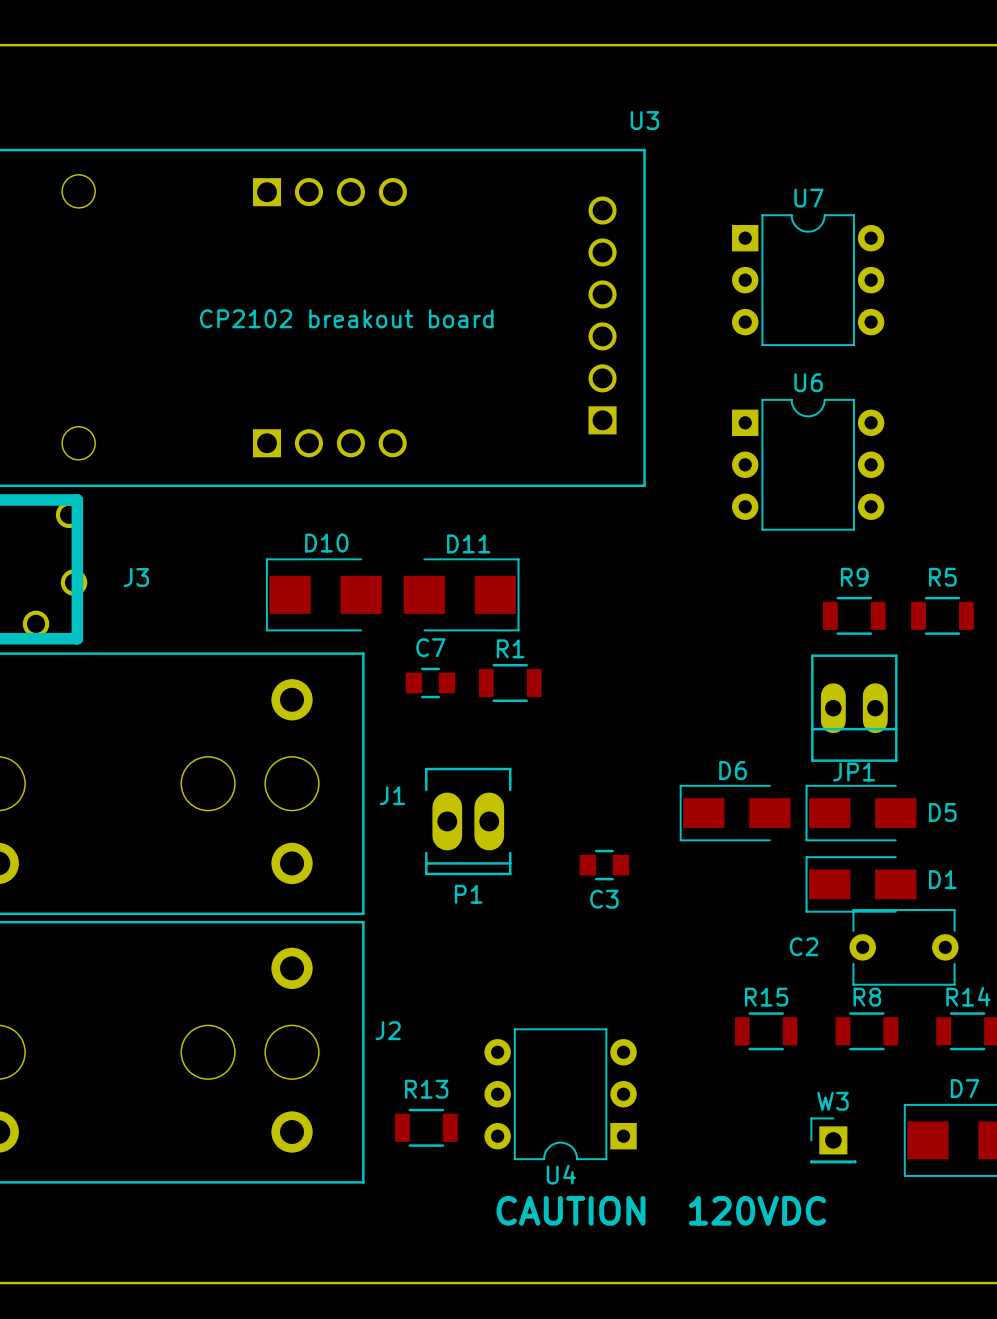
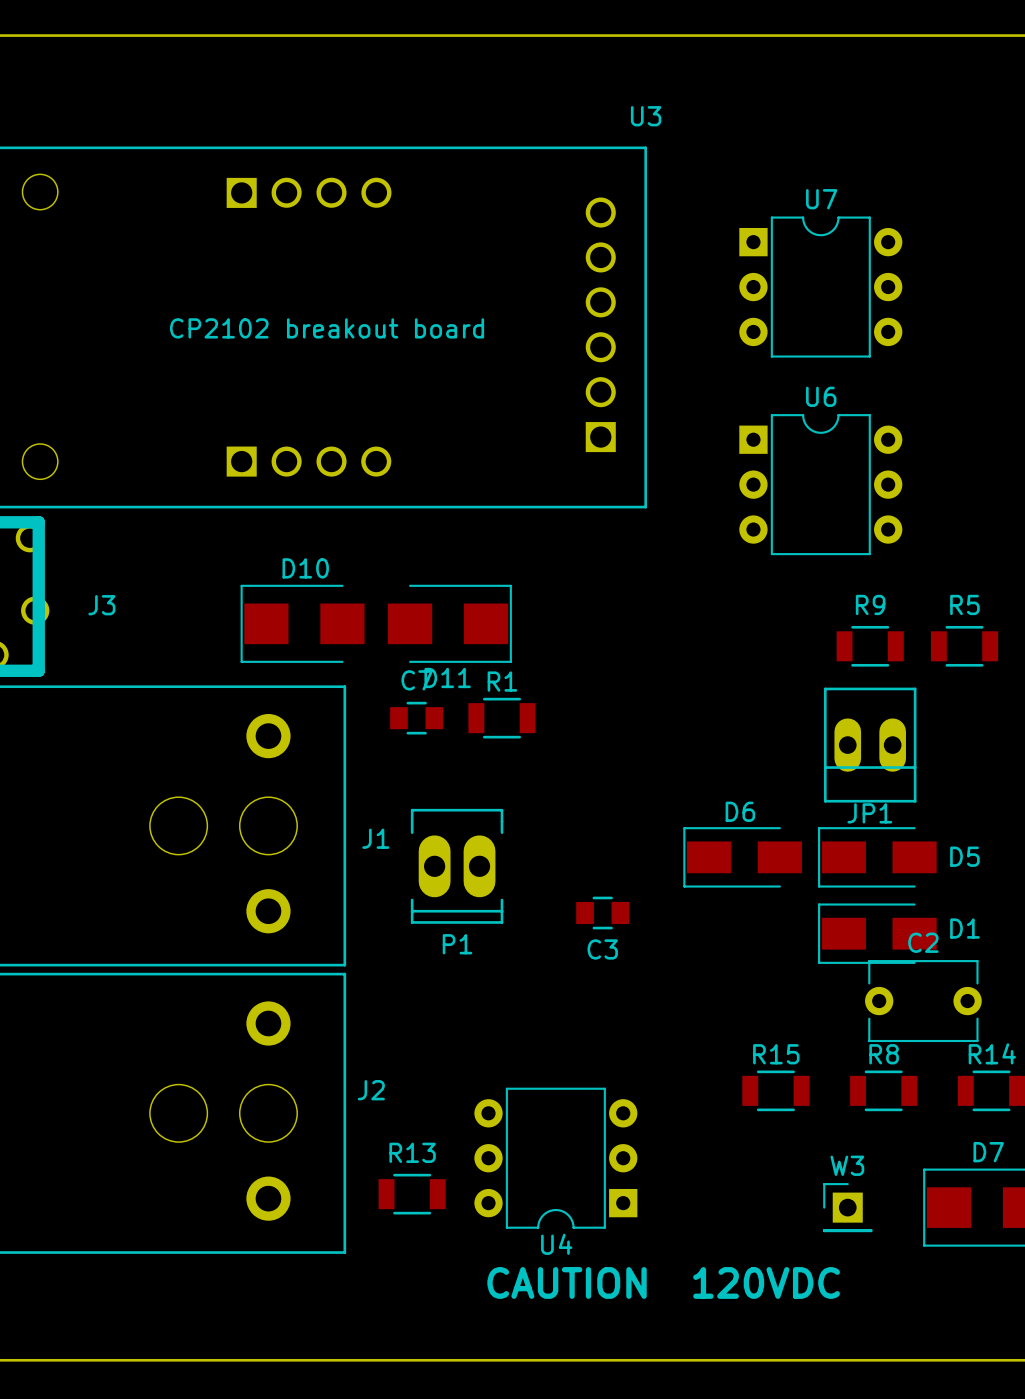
D11 name position: D11 (468, 543) -> D11 (447, 677)
C2 name position: C2 (803, 946) -> C2 (923, 942)

